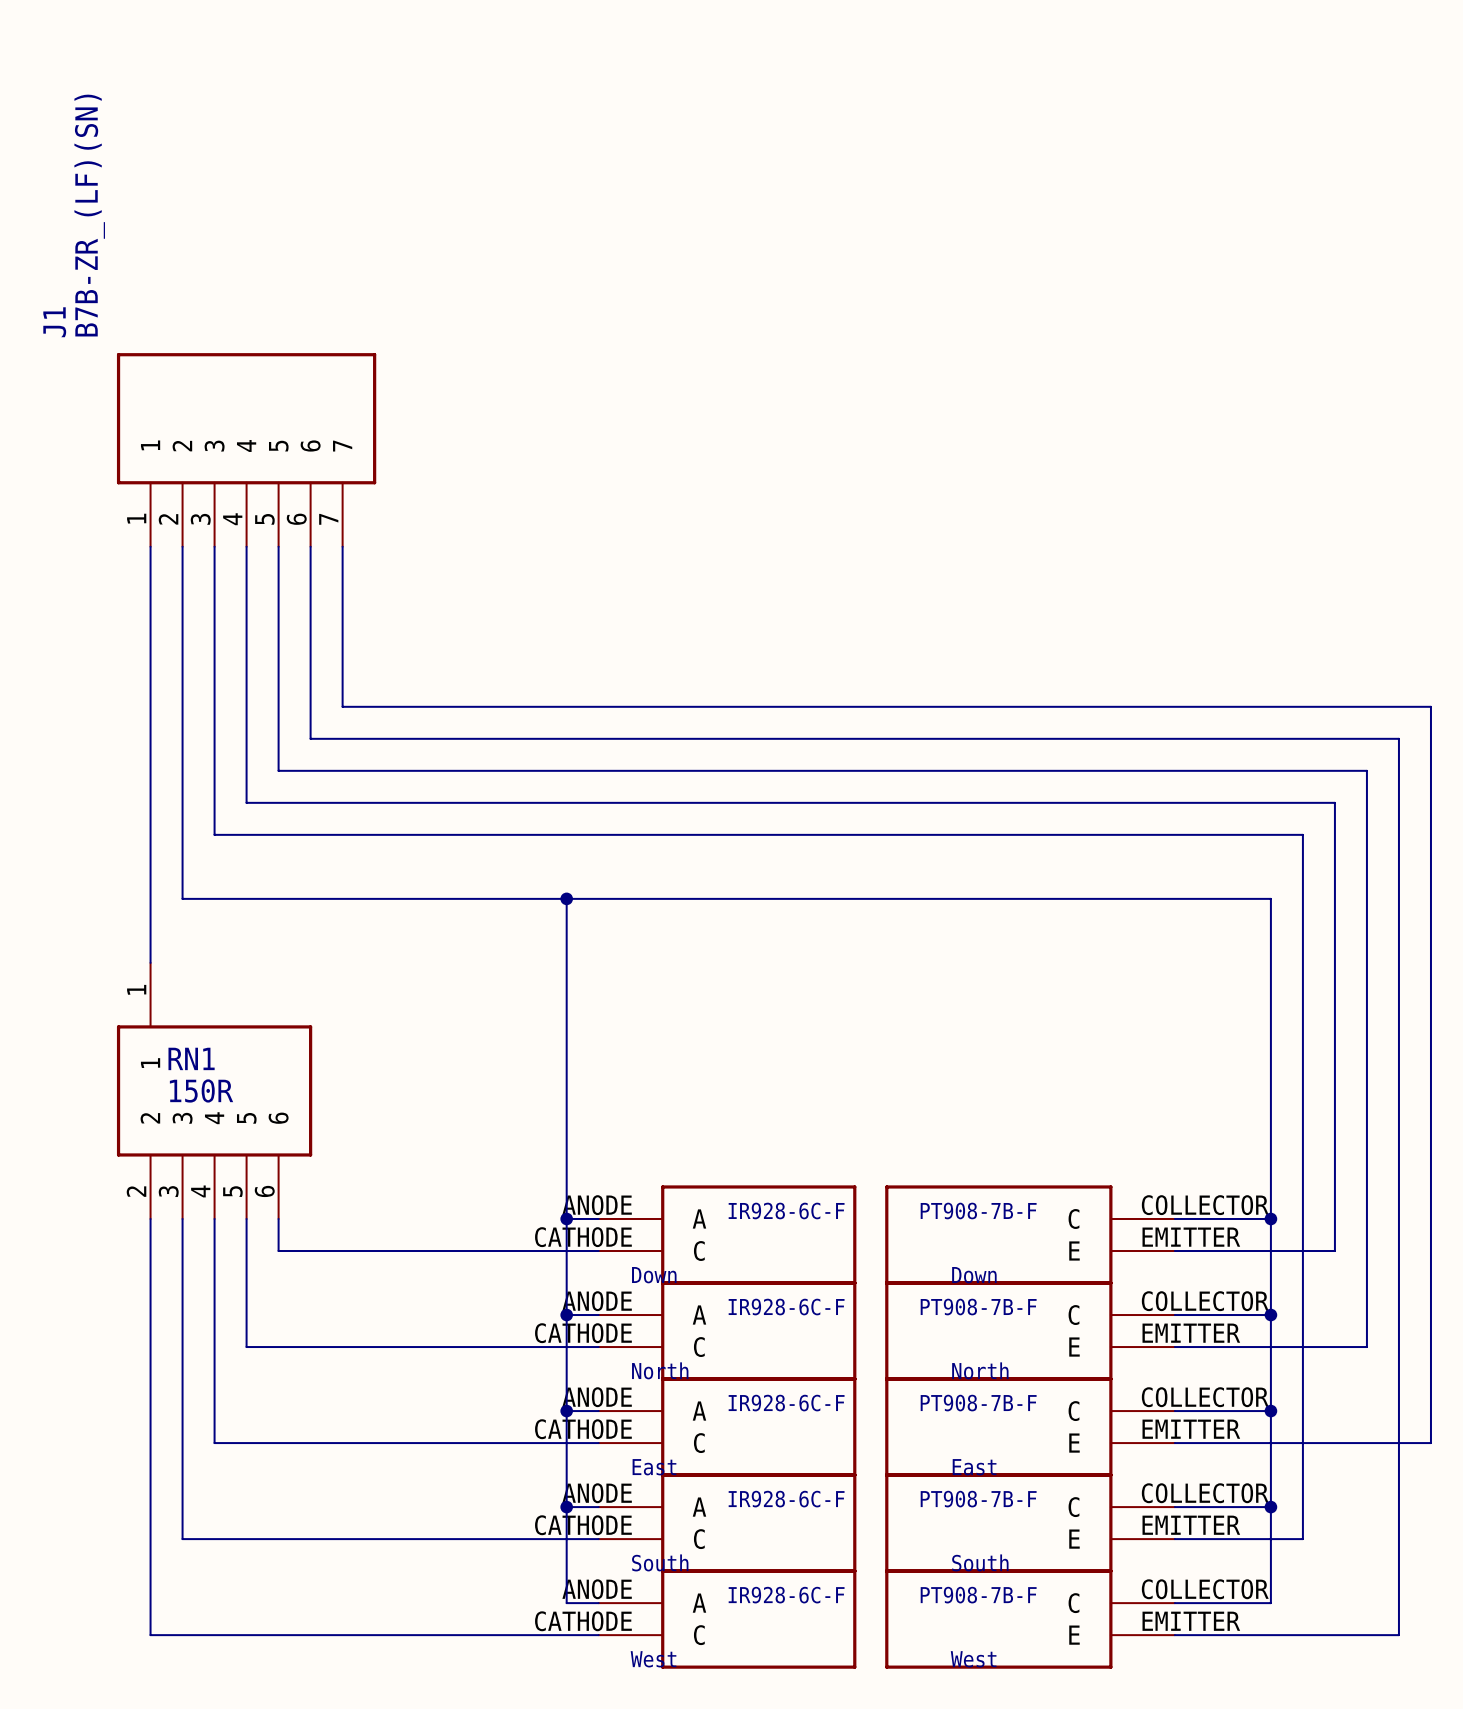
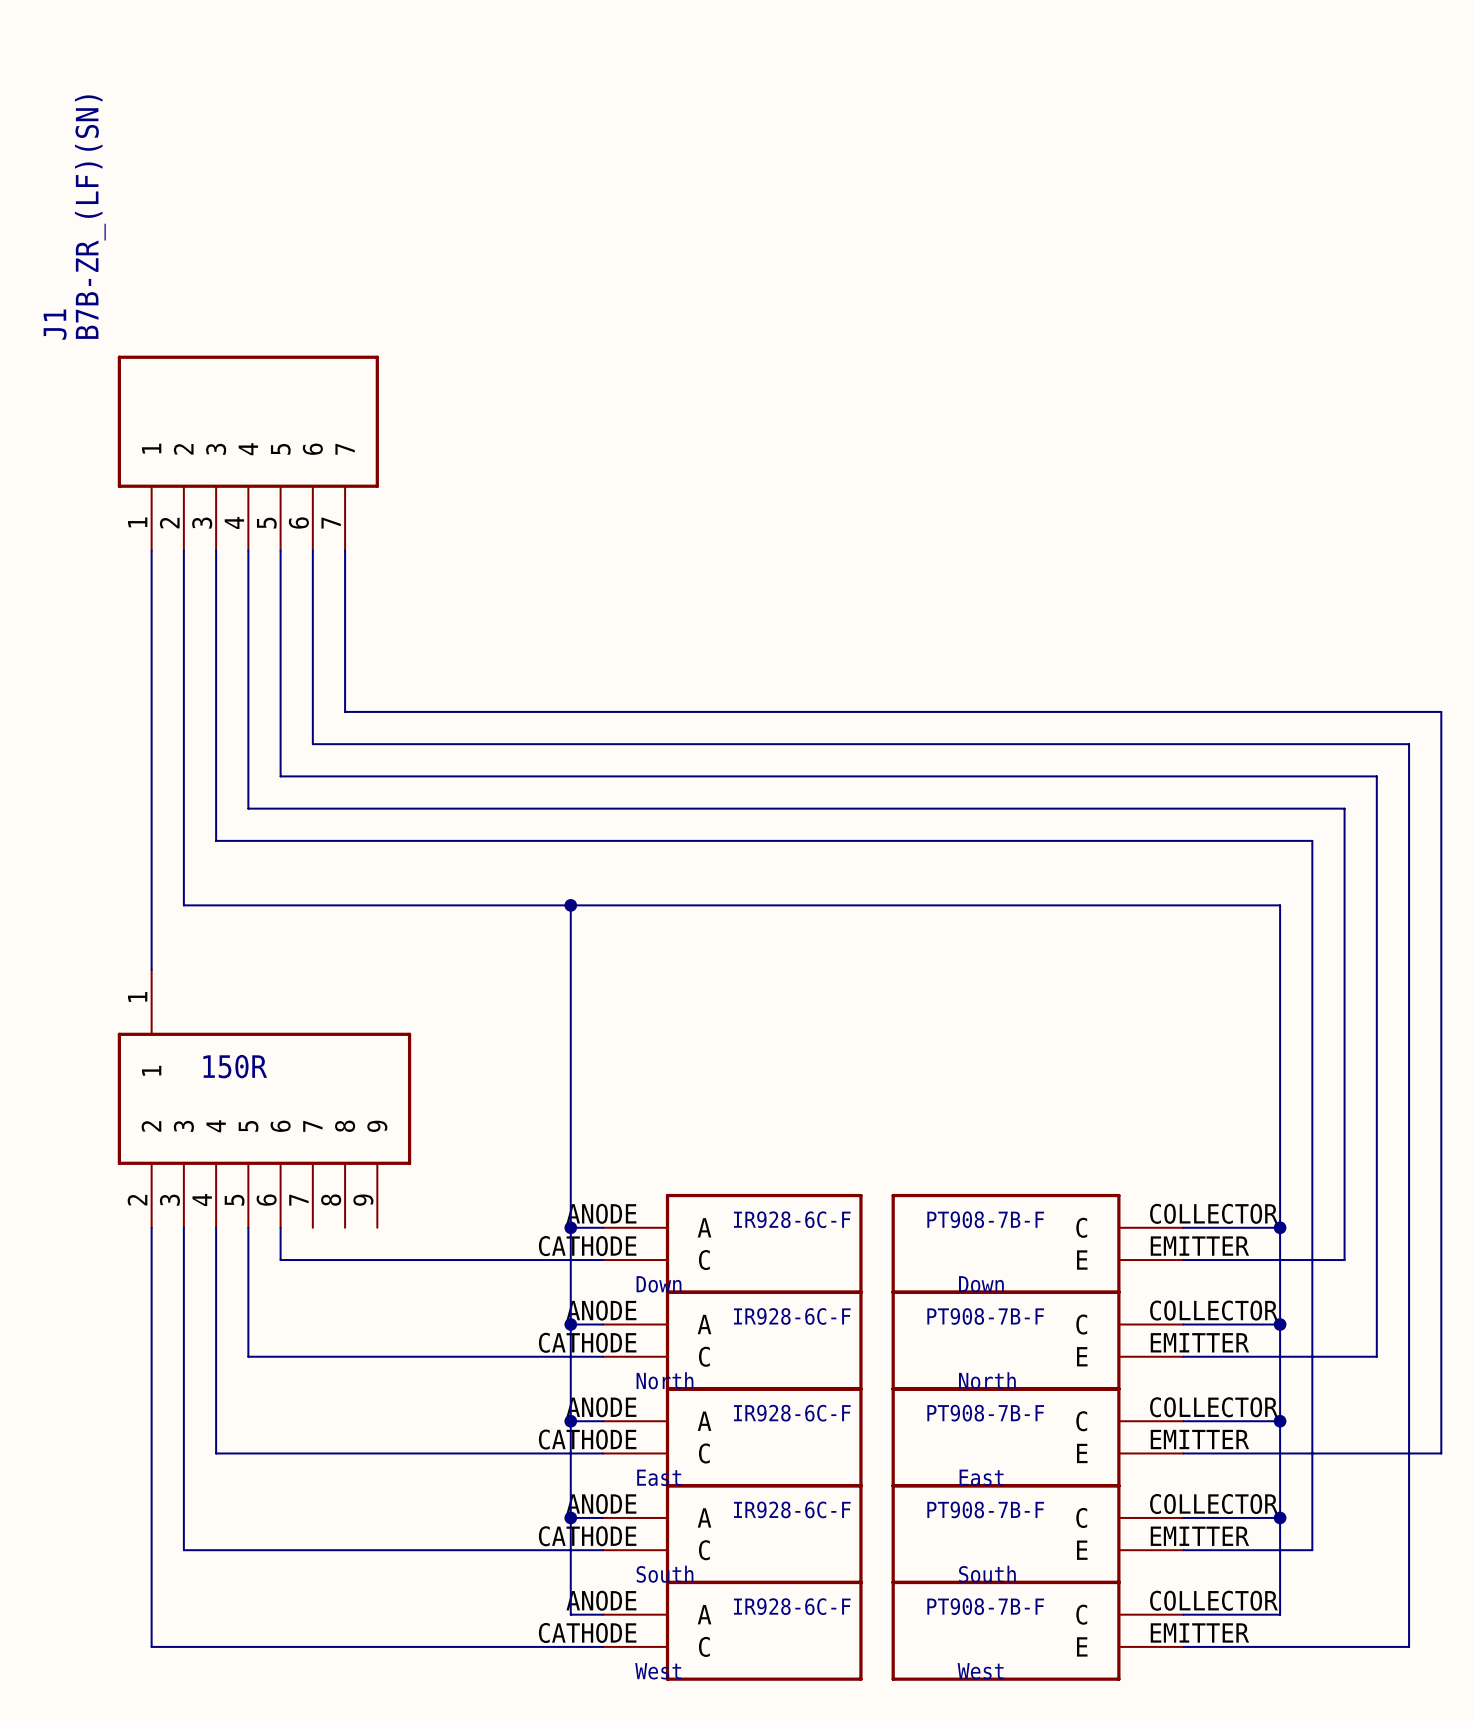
RN1: 150R (214, 1090) -> none
150R: none -> (264, 1098)

